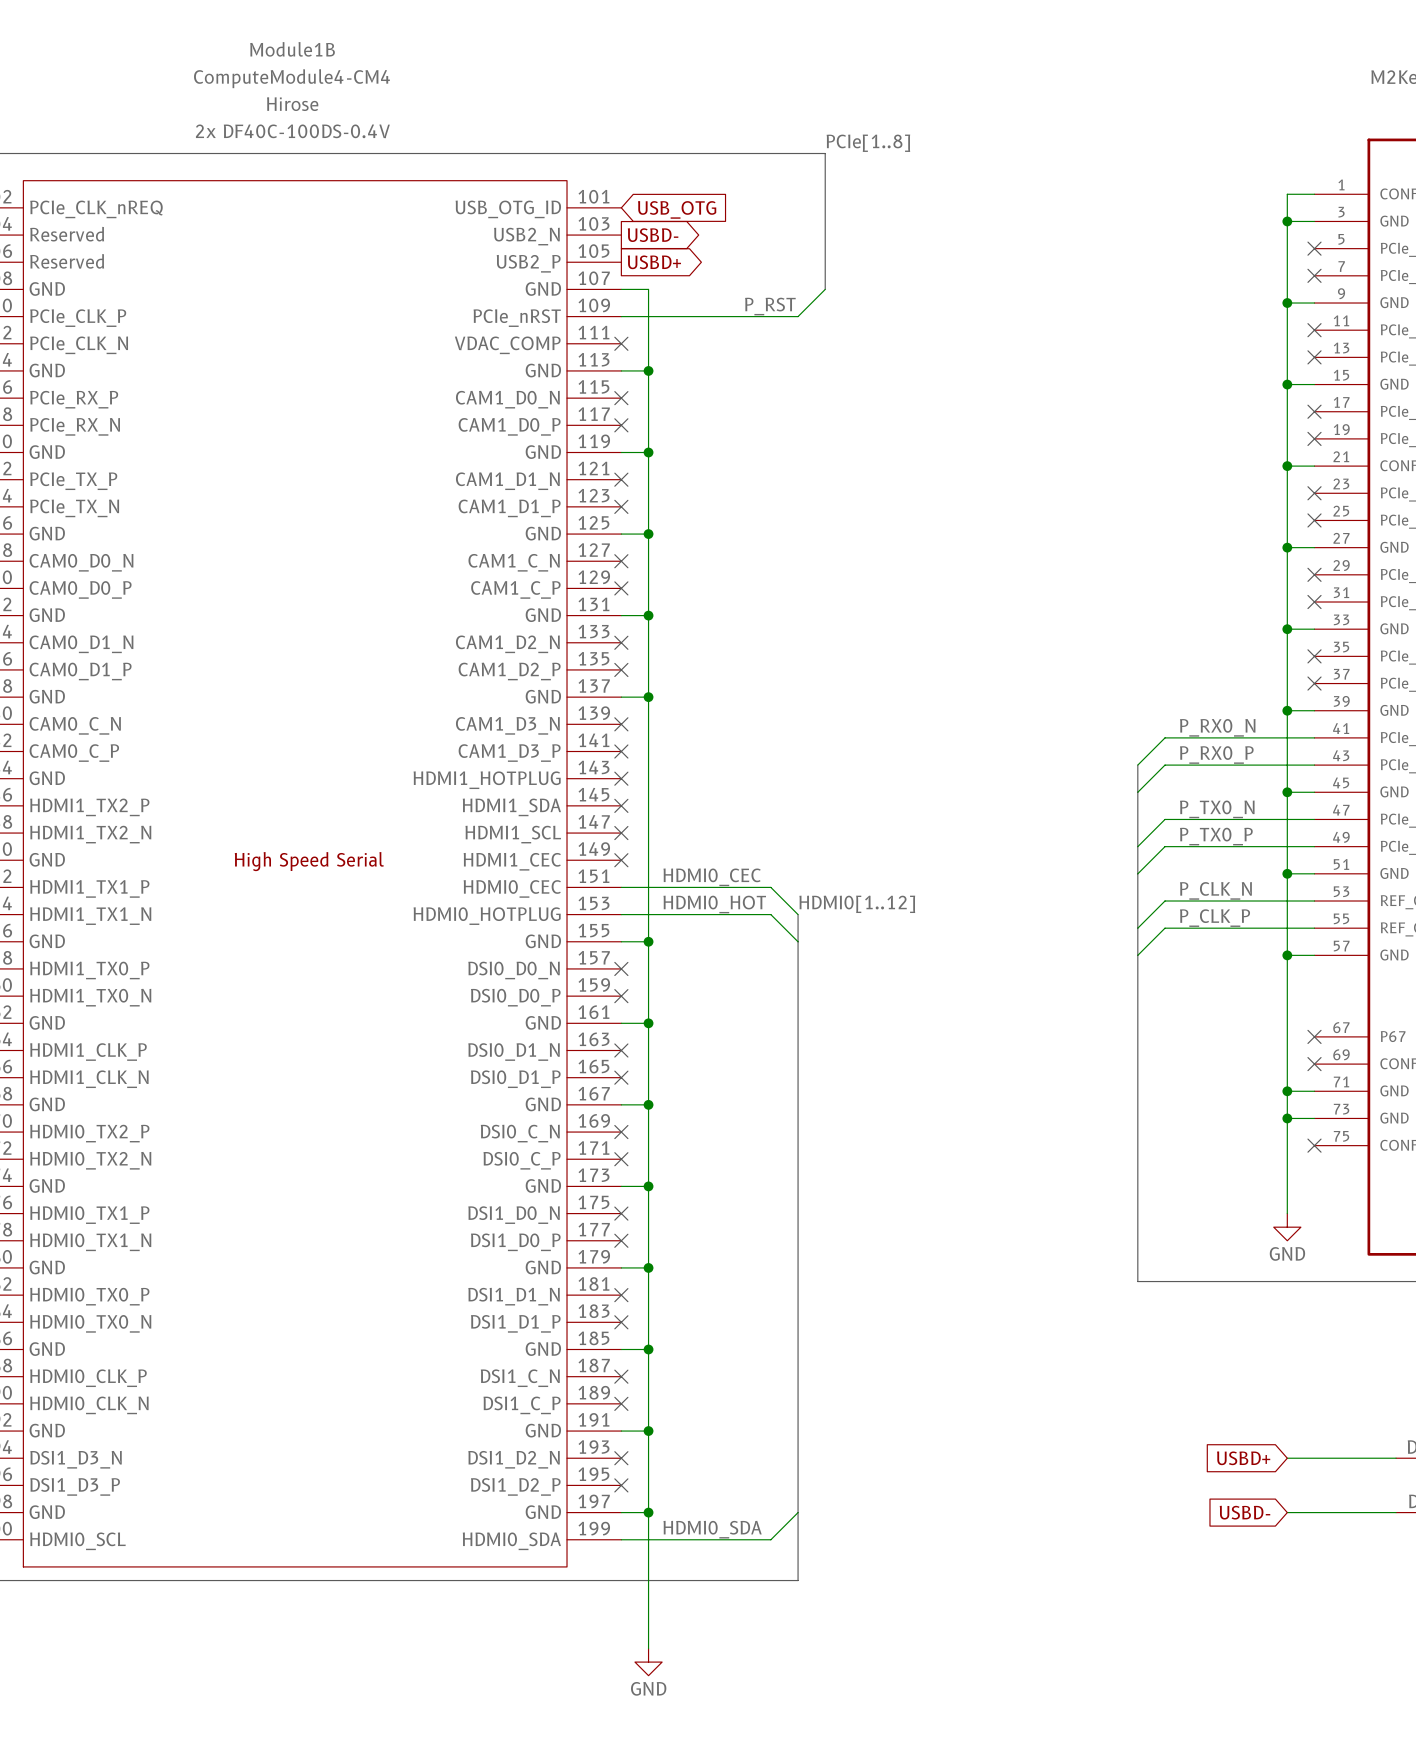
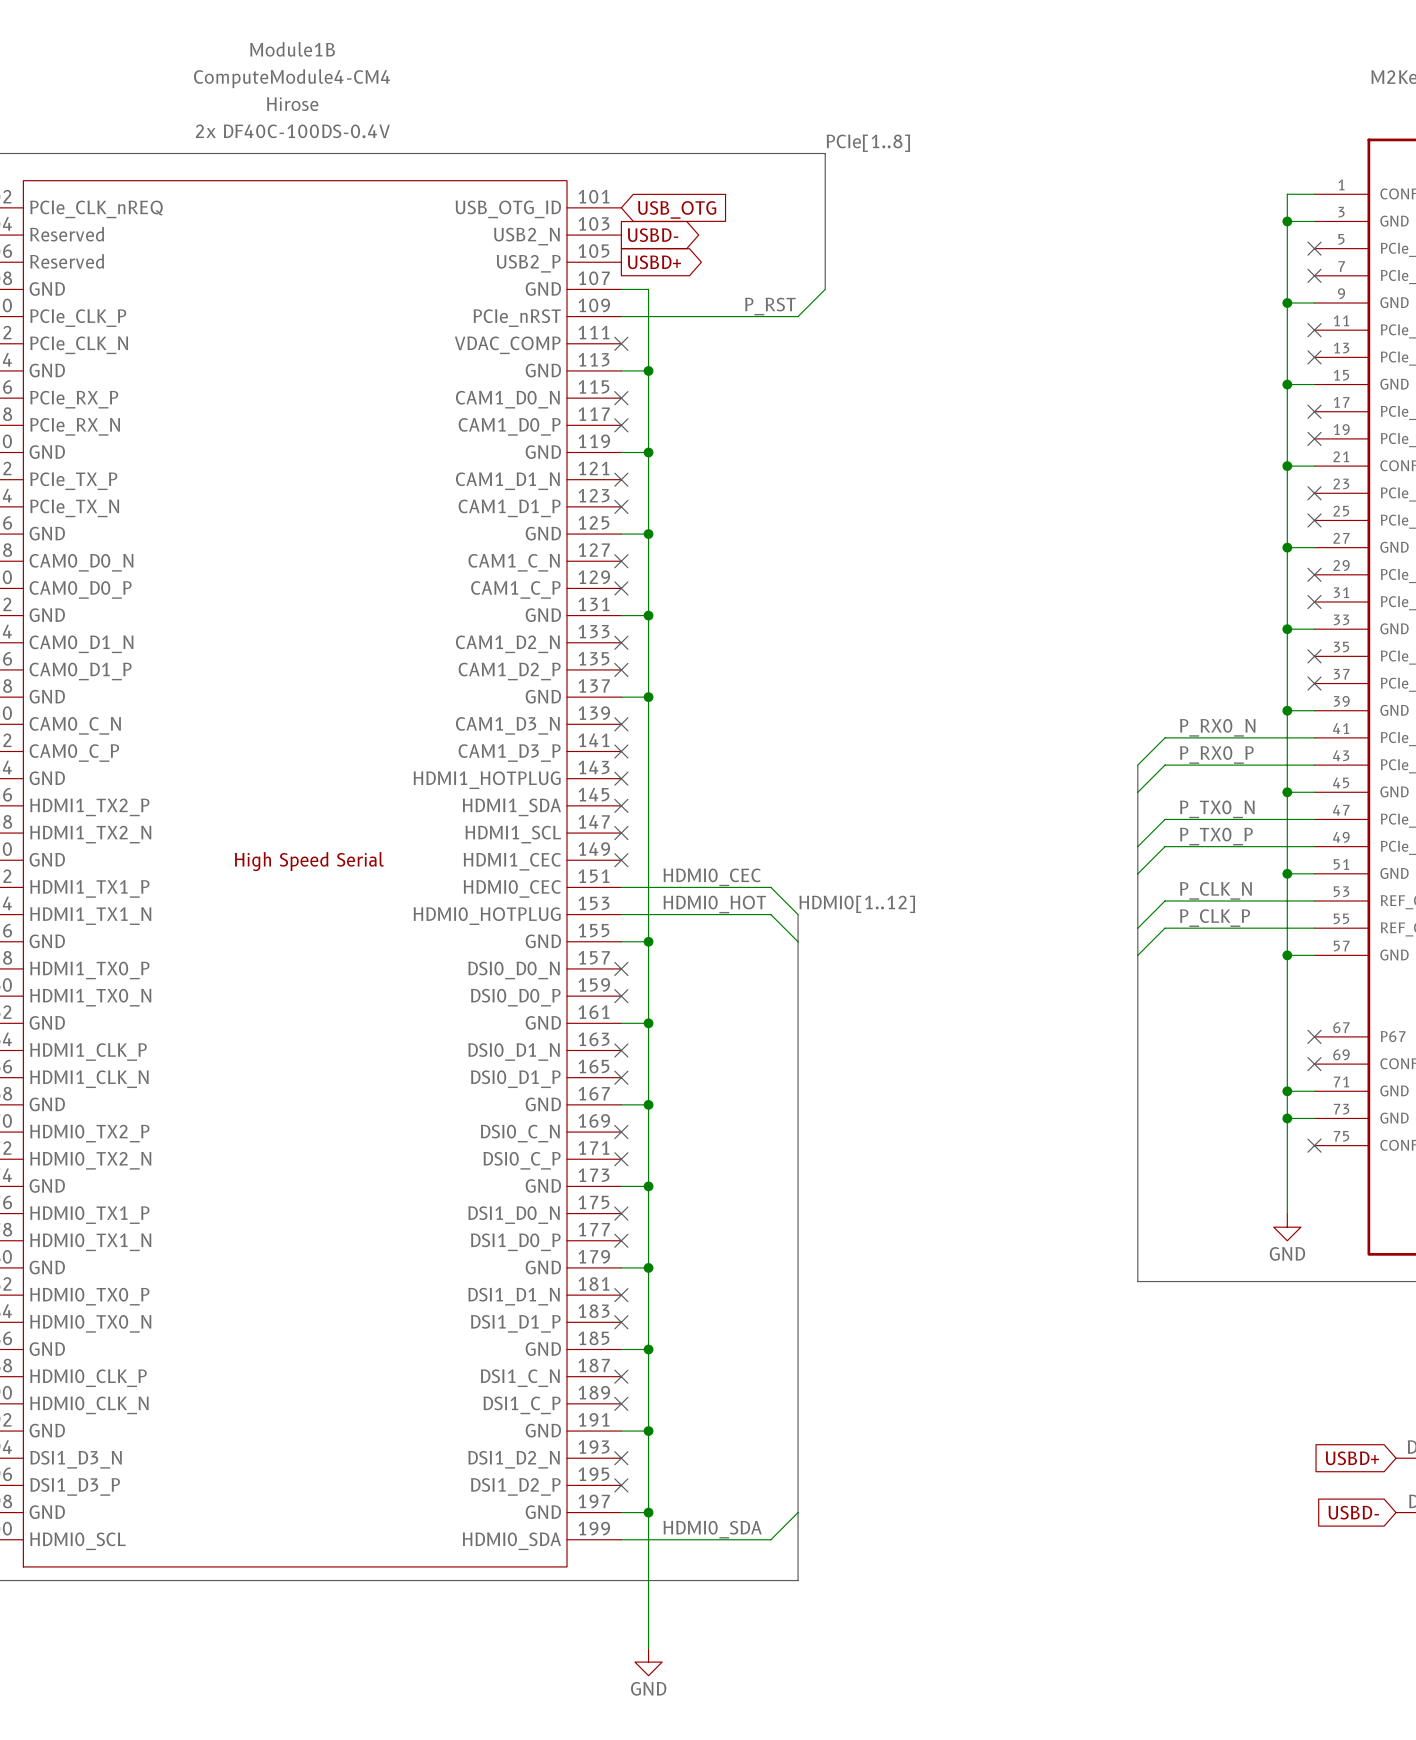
global label position: USBD+ (1243, 1458) -> USBD+ (1352, 1458)
wire: (1287, 1458) (1396, 1458) -> none
global label position: USBD- (1244, 1512) -> USBD- (1353, 1512)
wire: (1287, 1512) (1396, 1512) -> none

